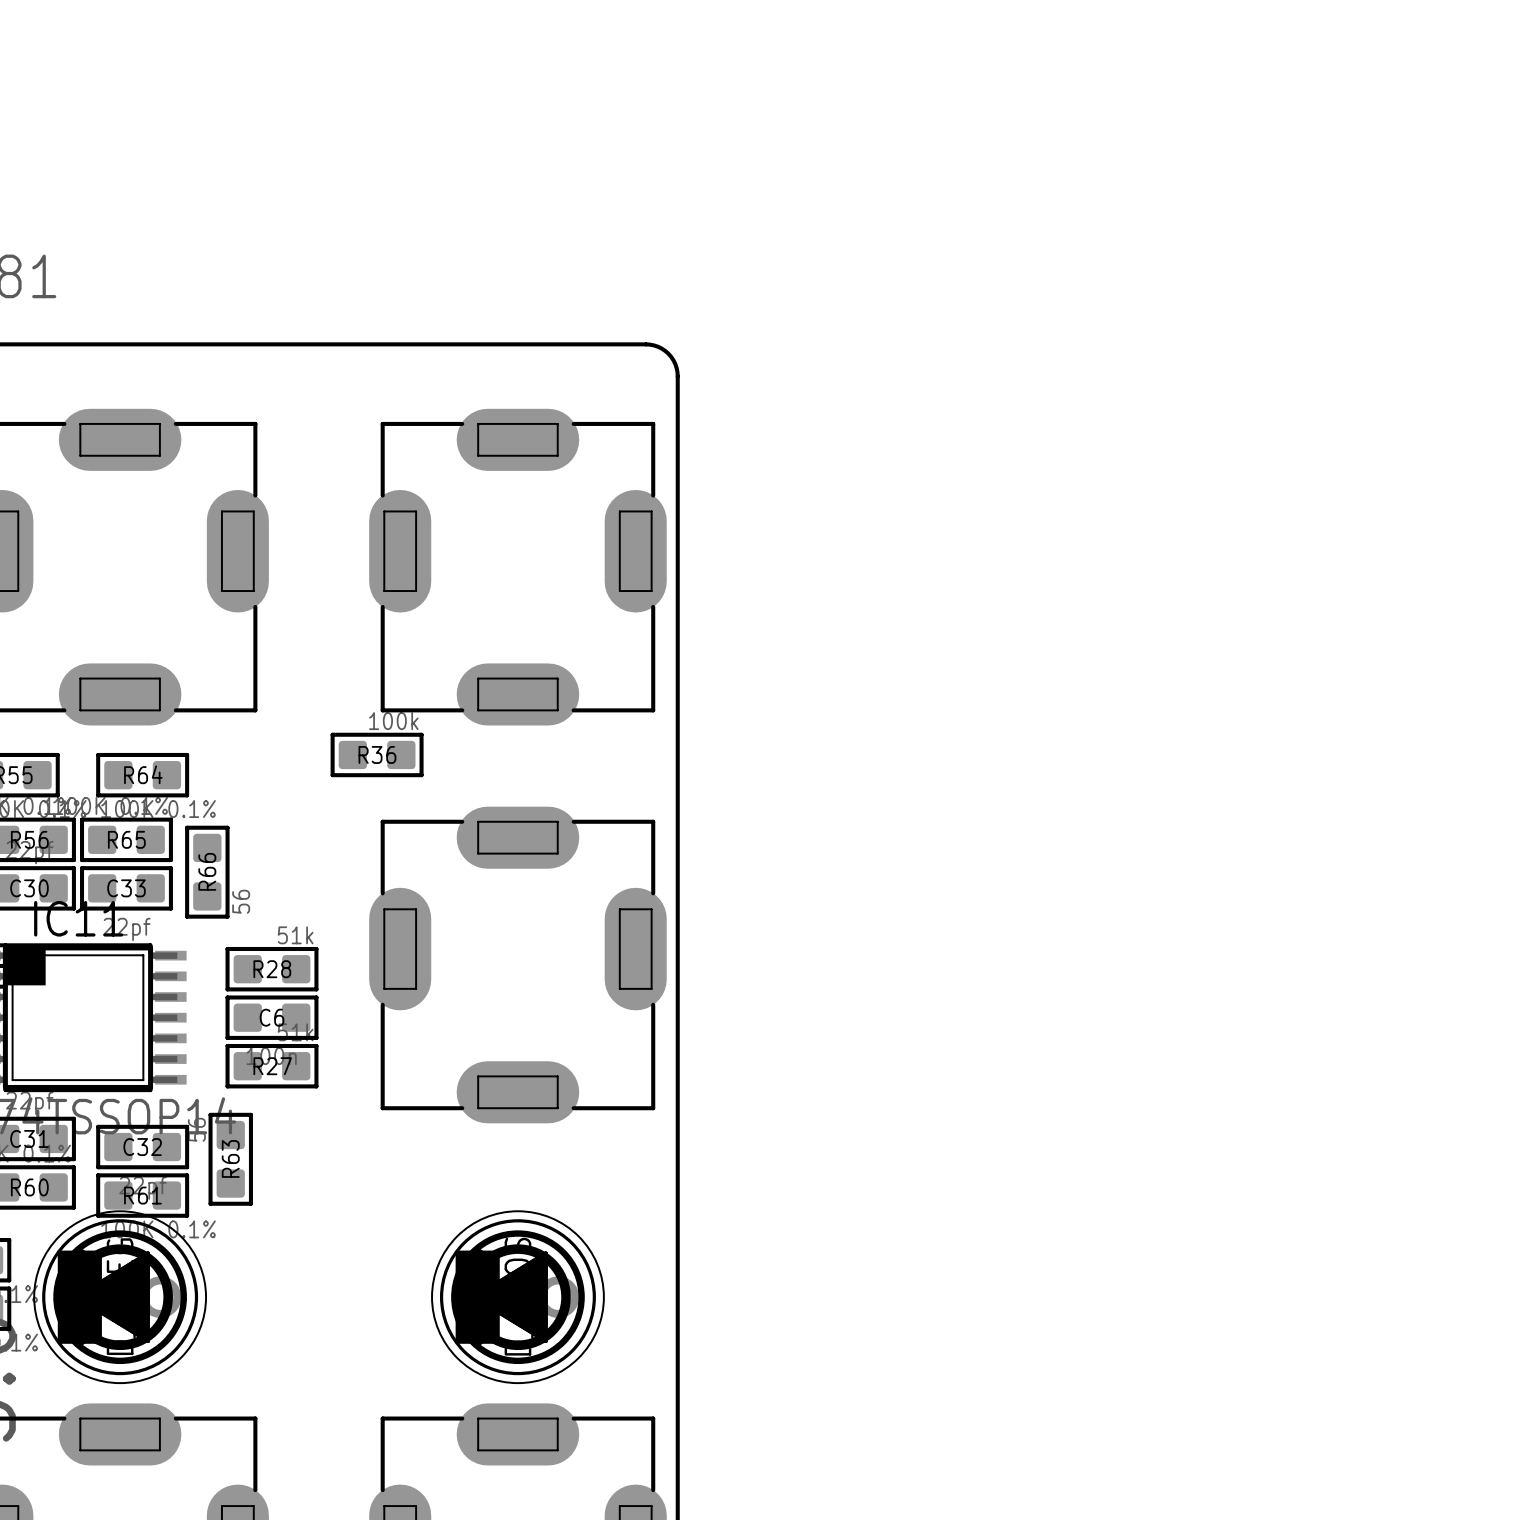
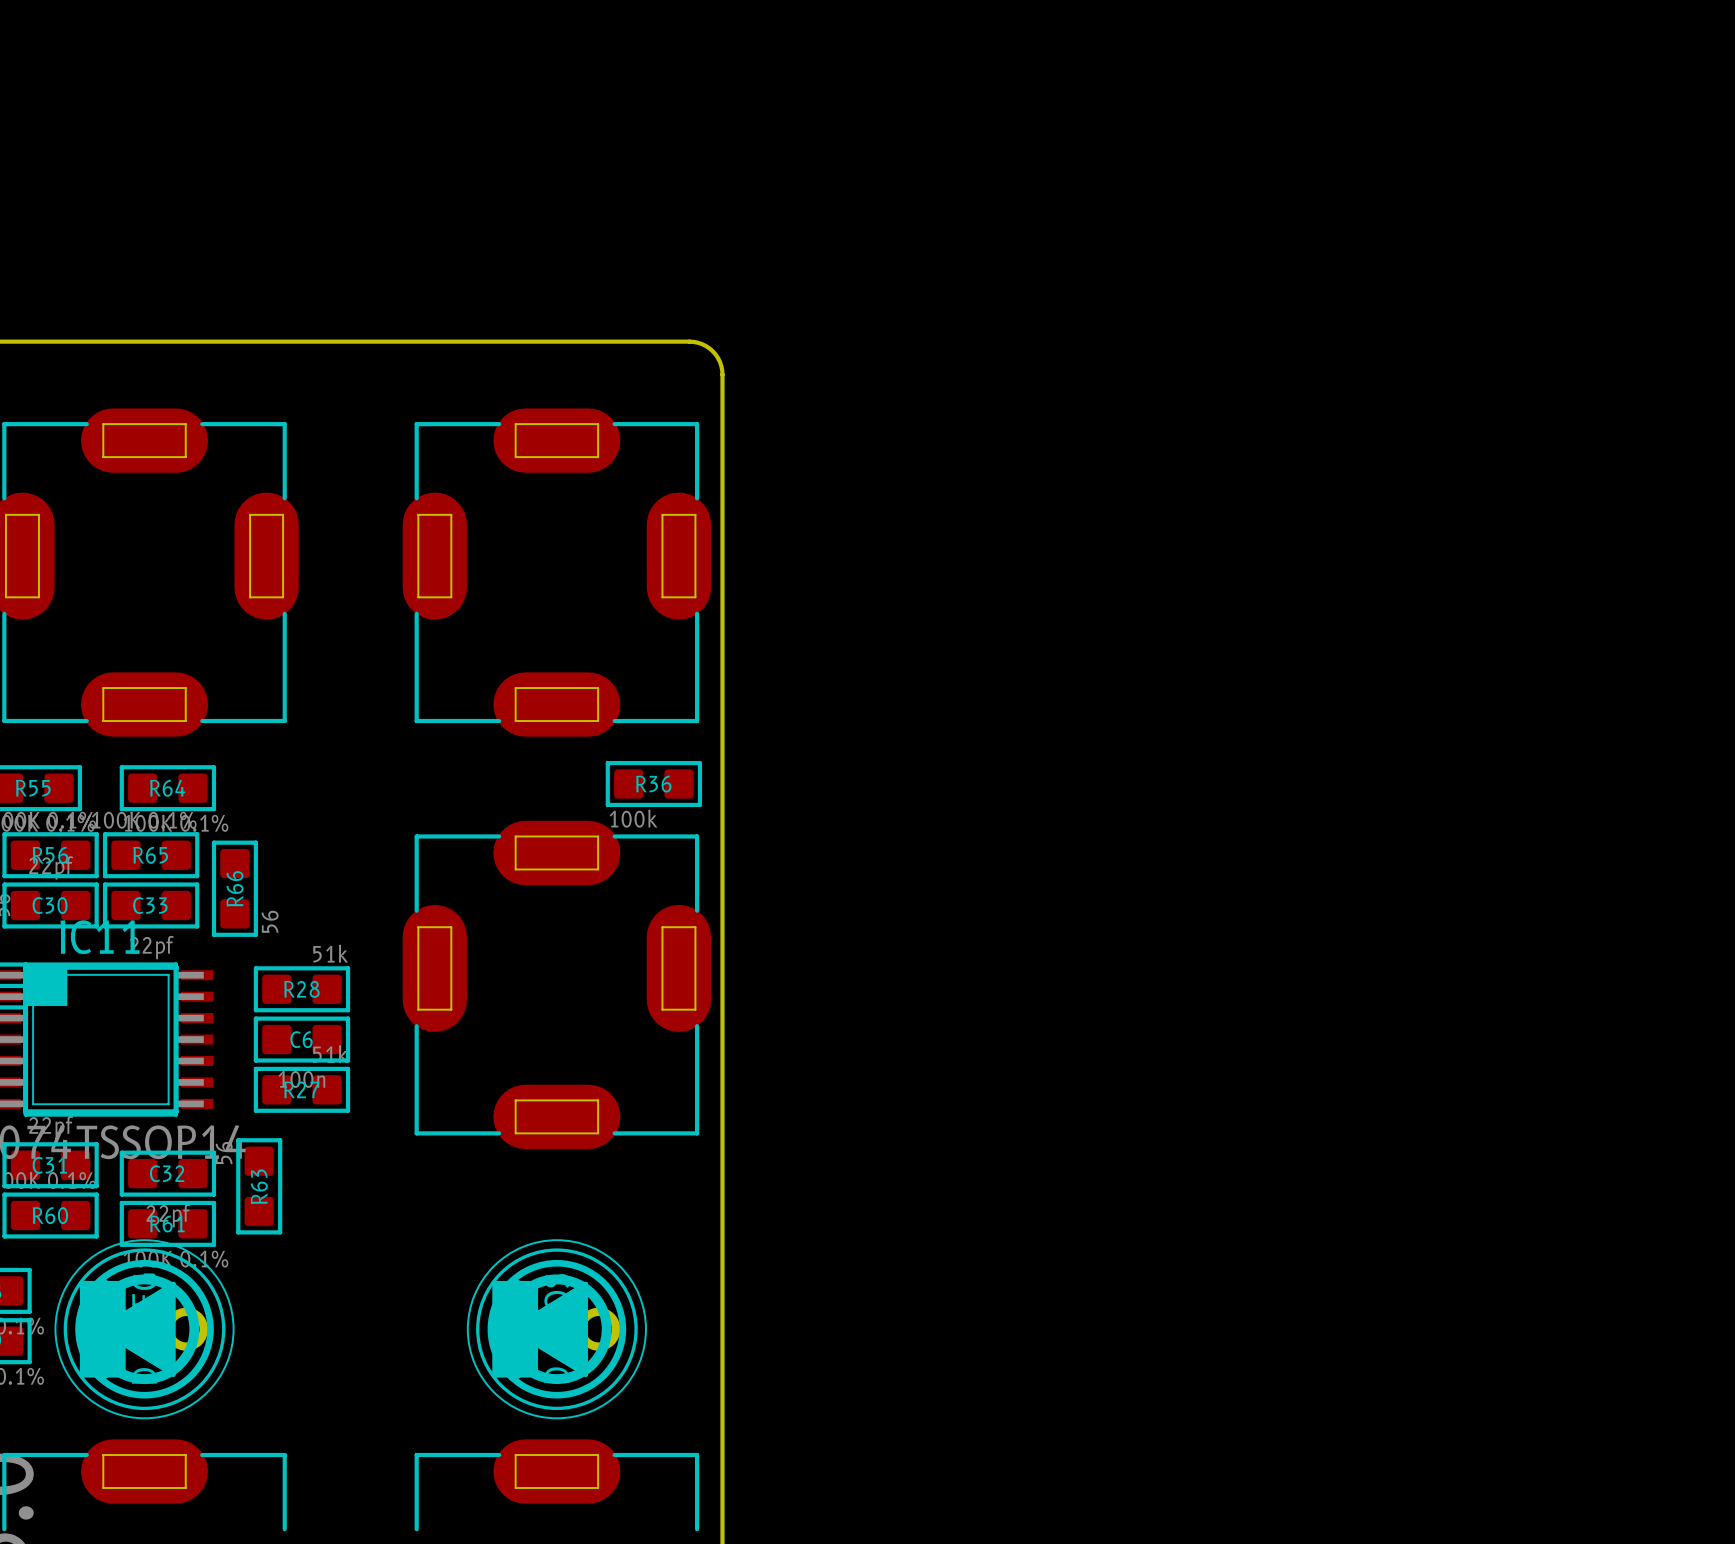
R36 value position: 100k (393, 721) -> 100k (633, 818)
R36 position: (377, 754) -> (653, 783)

